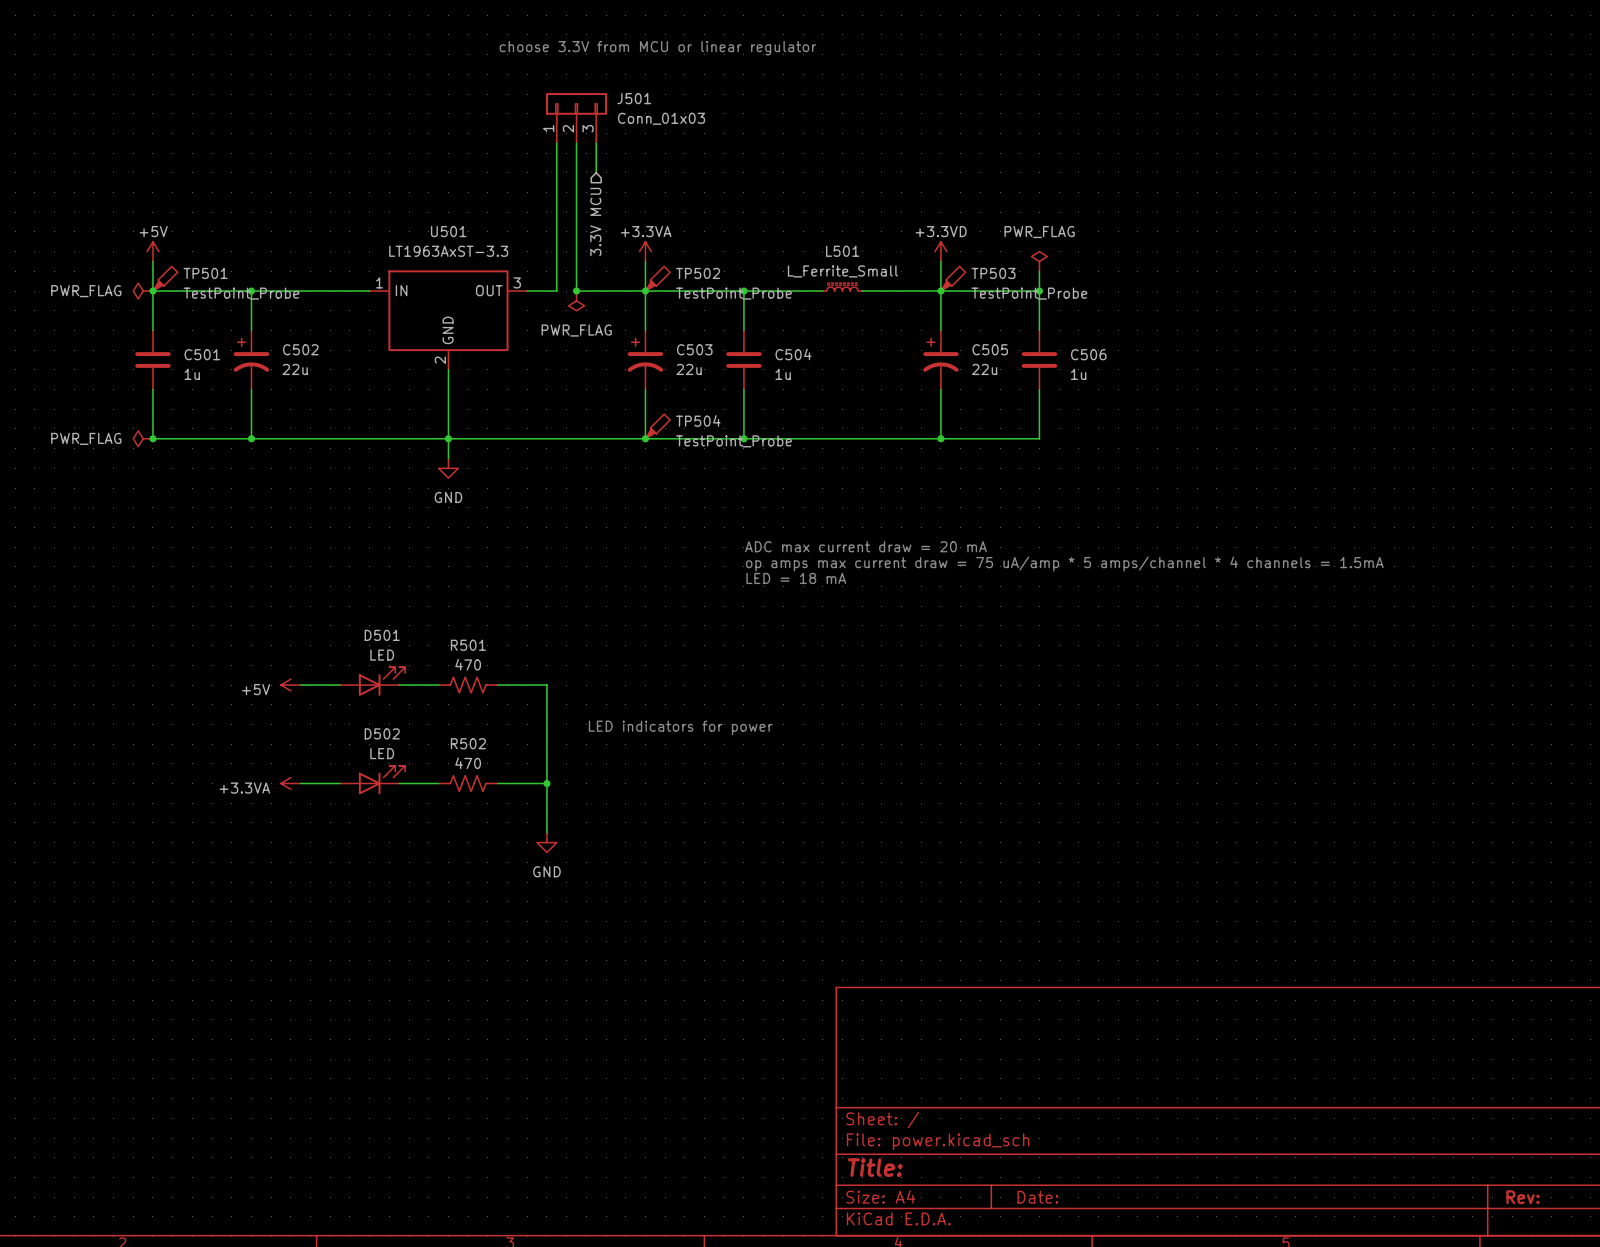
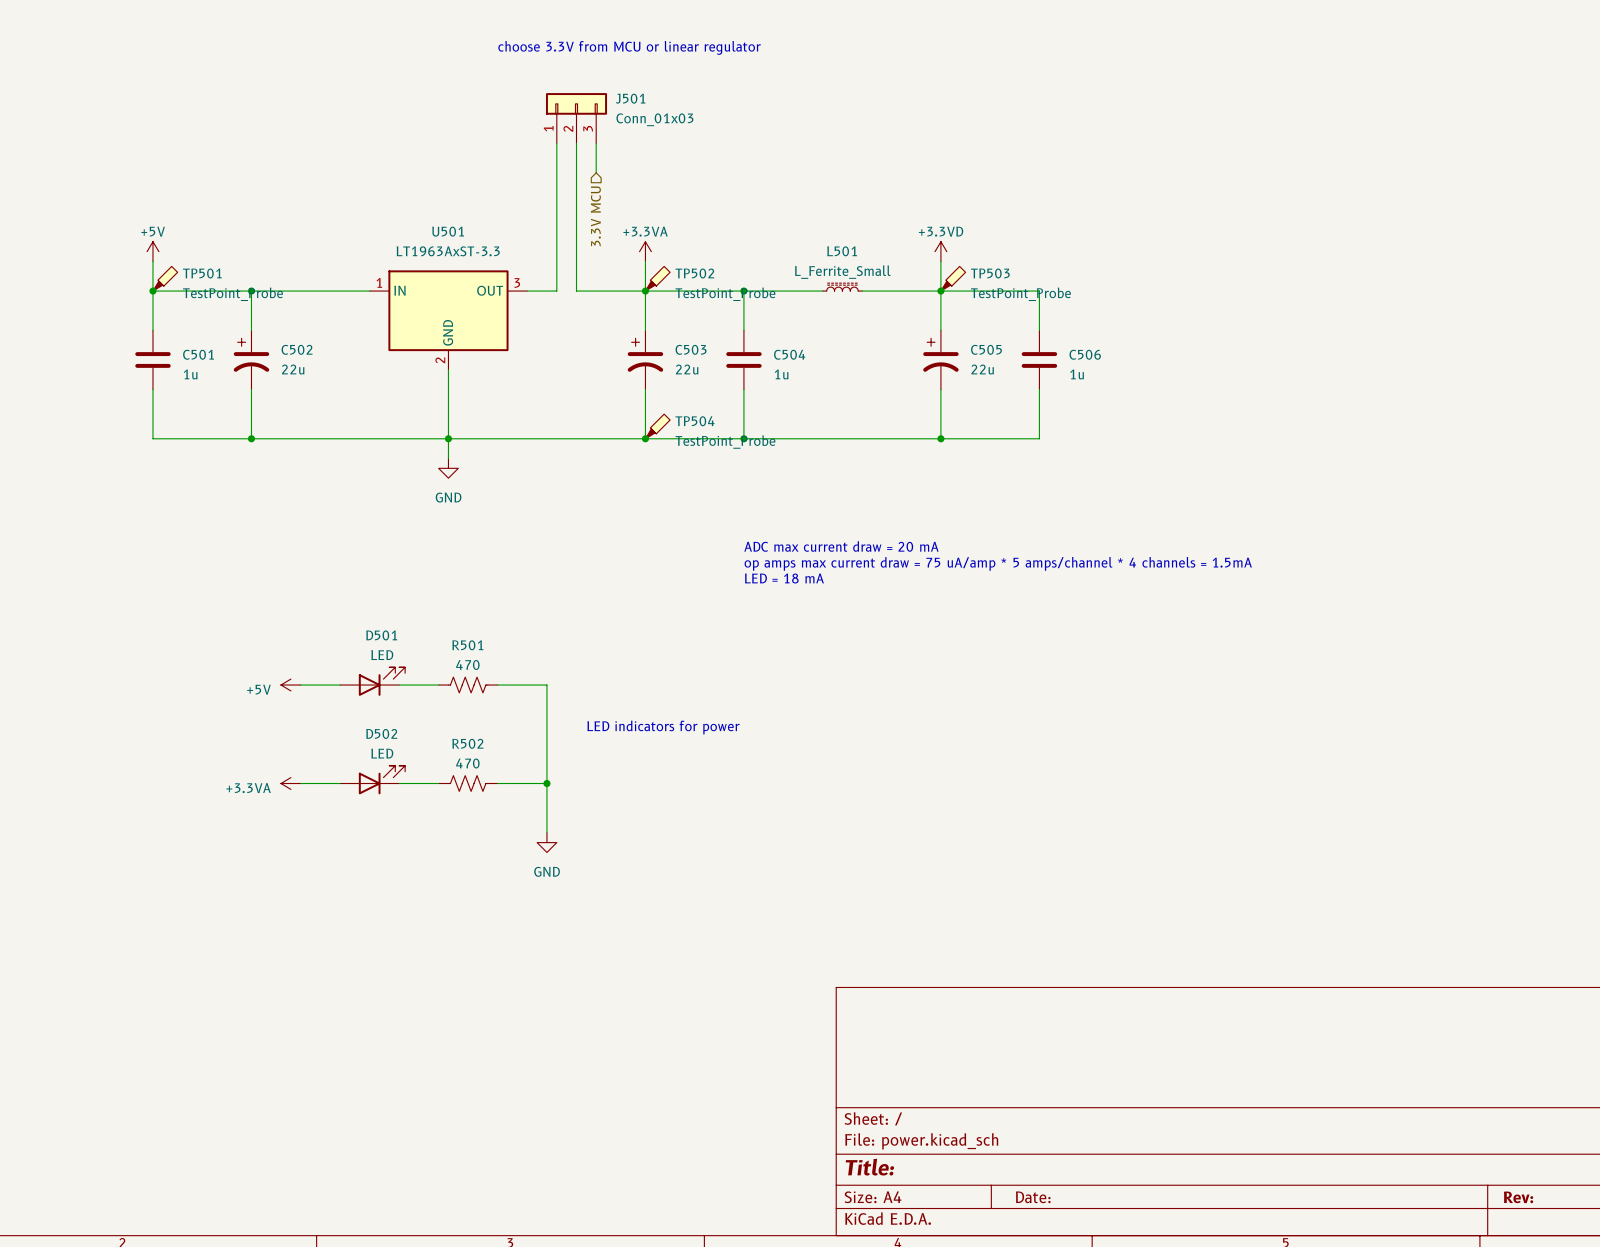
power symbol: PWR_FLAG (1039, 261) -> none
wire: (1039, 271) (1039, 291) -> none
power symbol: PWR_FLAG (143, 291) -> none
junction: (576, 291) -> none
junction: (1039, 291) -> none
power symbol: PWR_FLAG (576, 300) -> none
power symbol: PWR_FLAG (143, 438) -> none
junction: (152, 438) -> none

